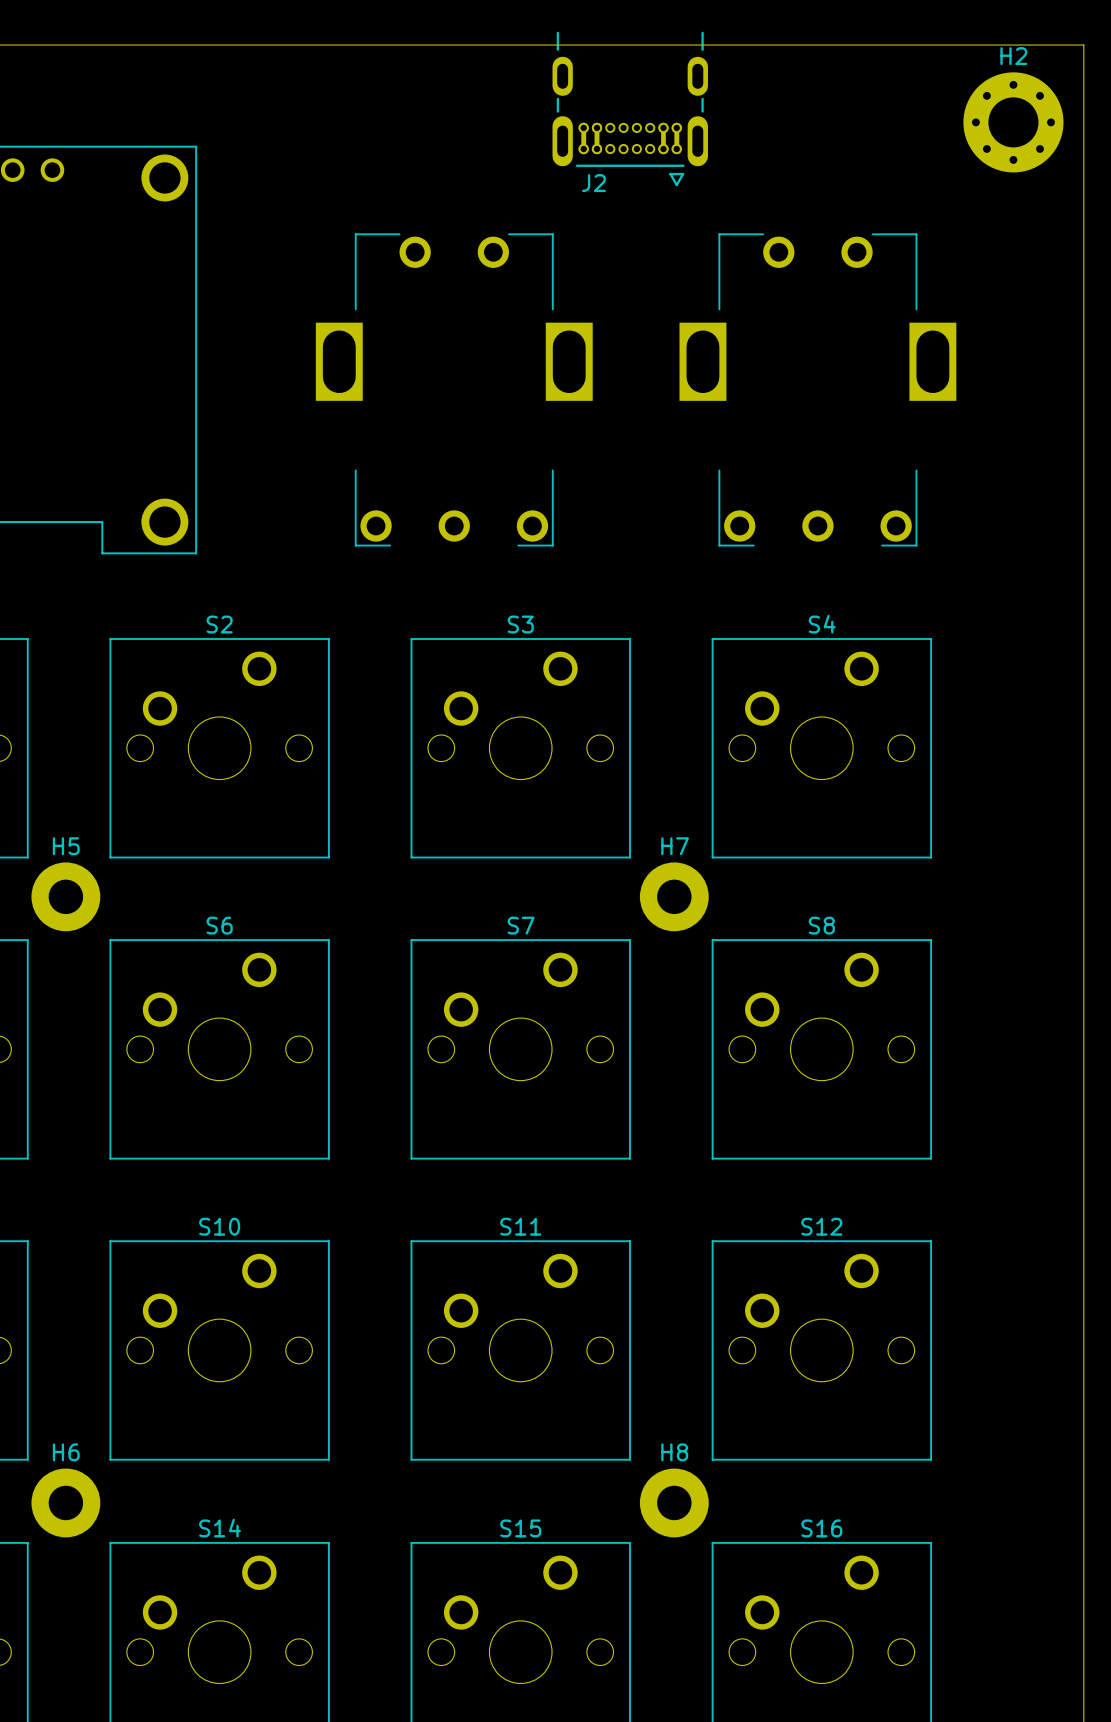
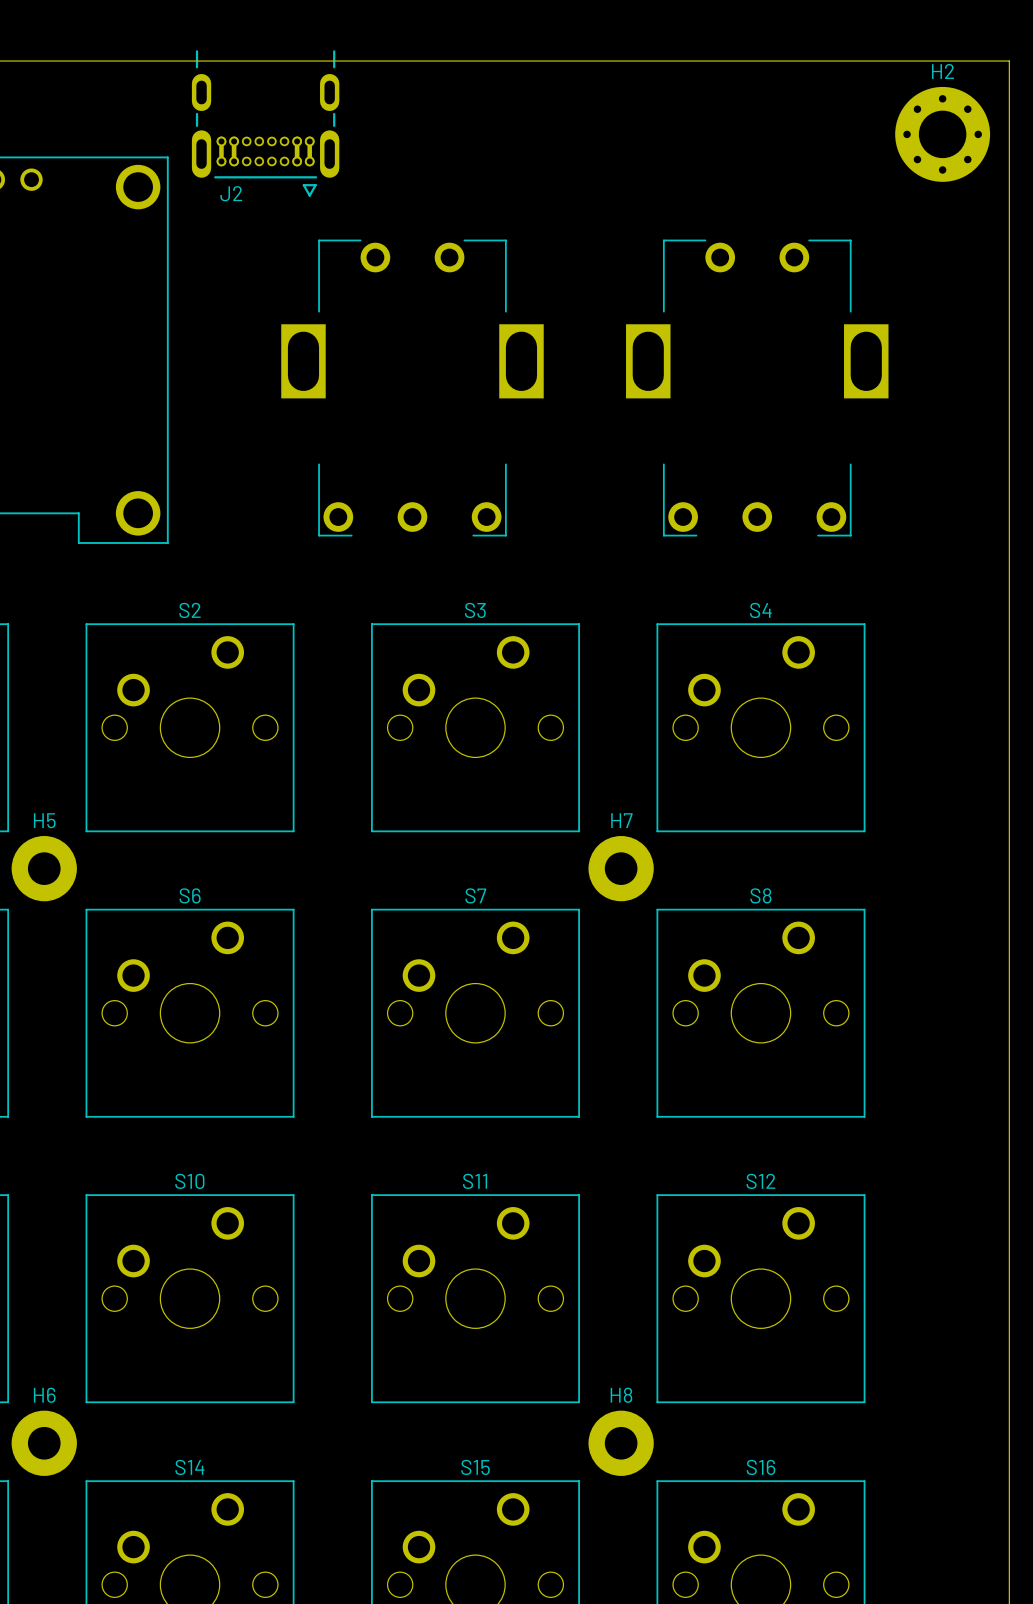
J2 position: (630, 108) -> (265, 123)

